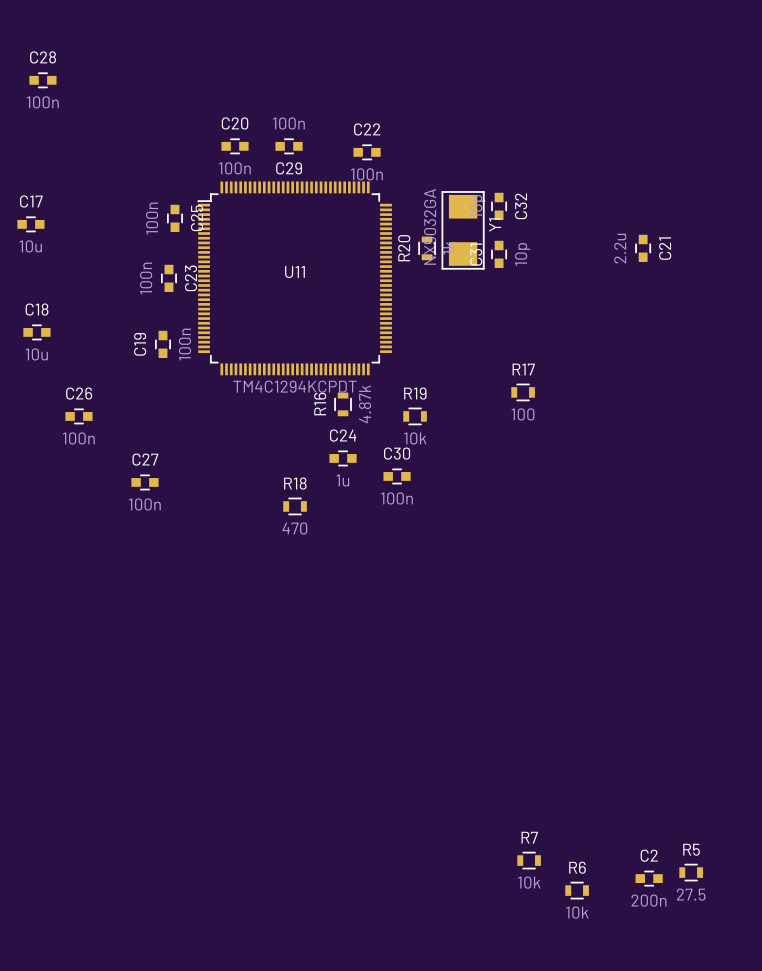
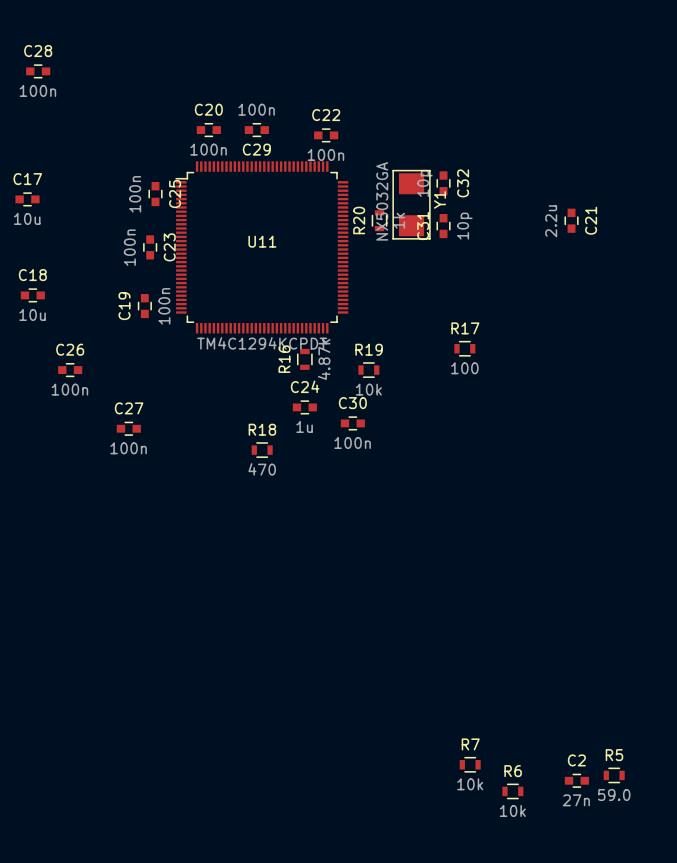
R5 value: 27.5 (691, 894) -> 59.0 (614, 794)
C2 value: 200n (648, 900) -> 27n (576, 800)

